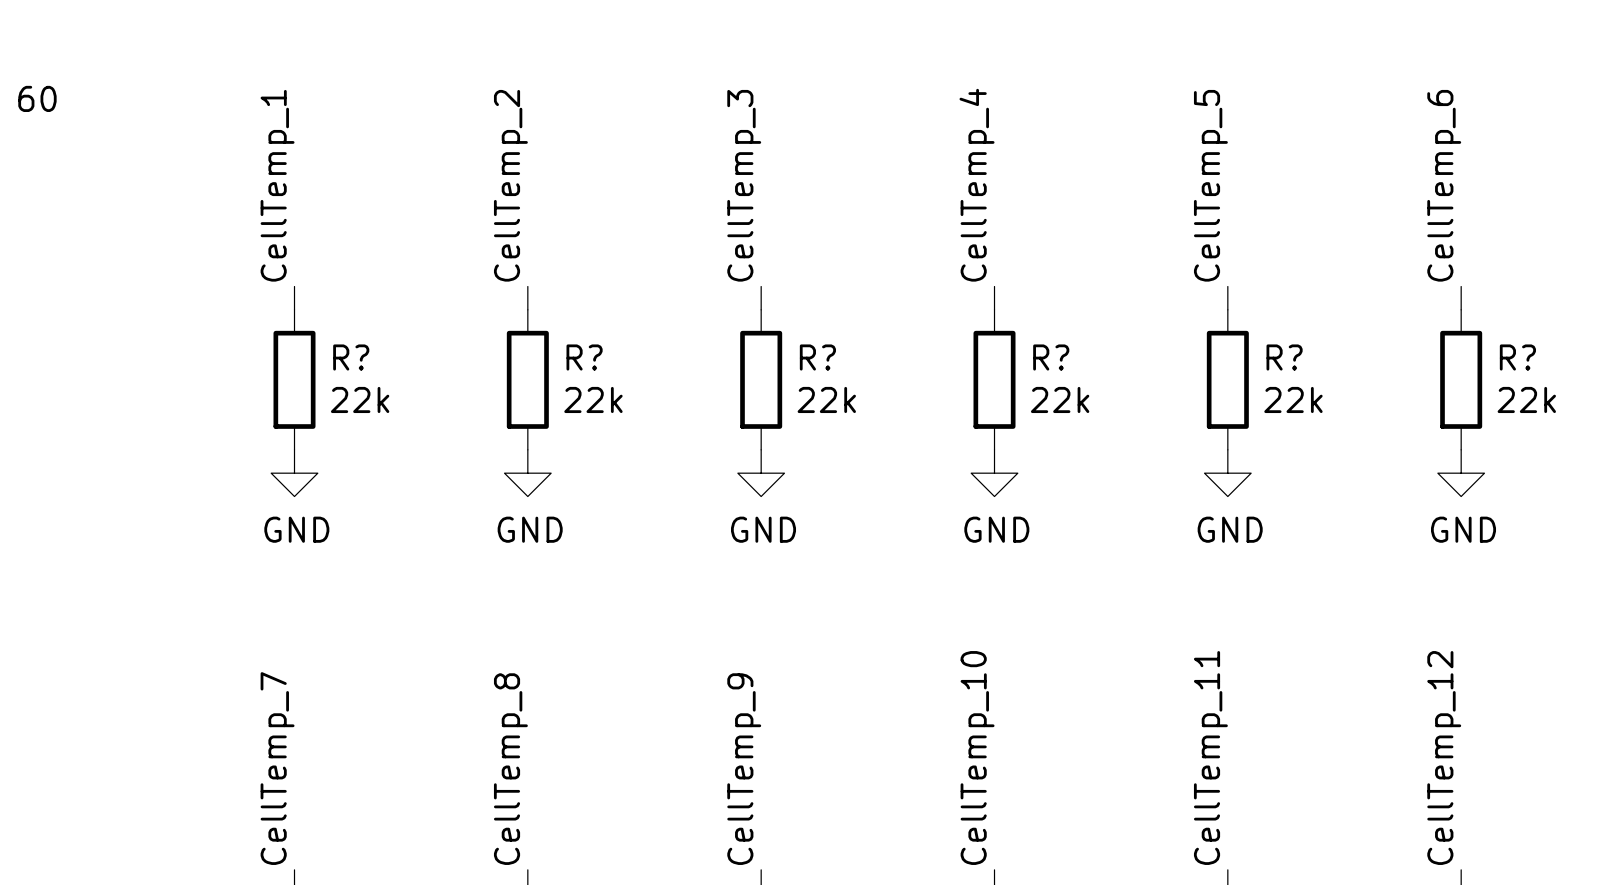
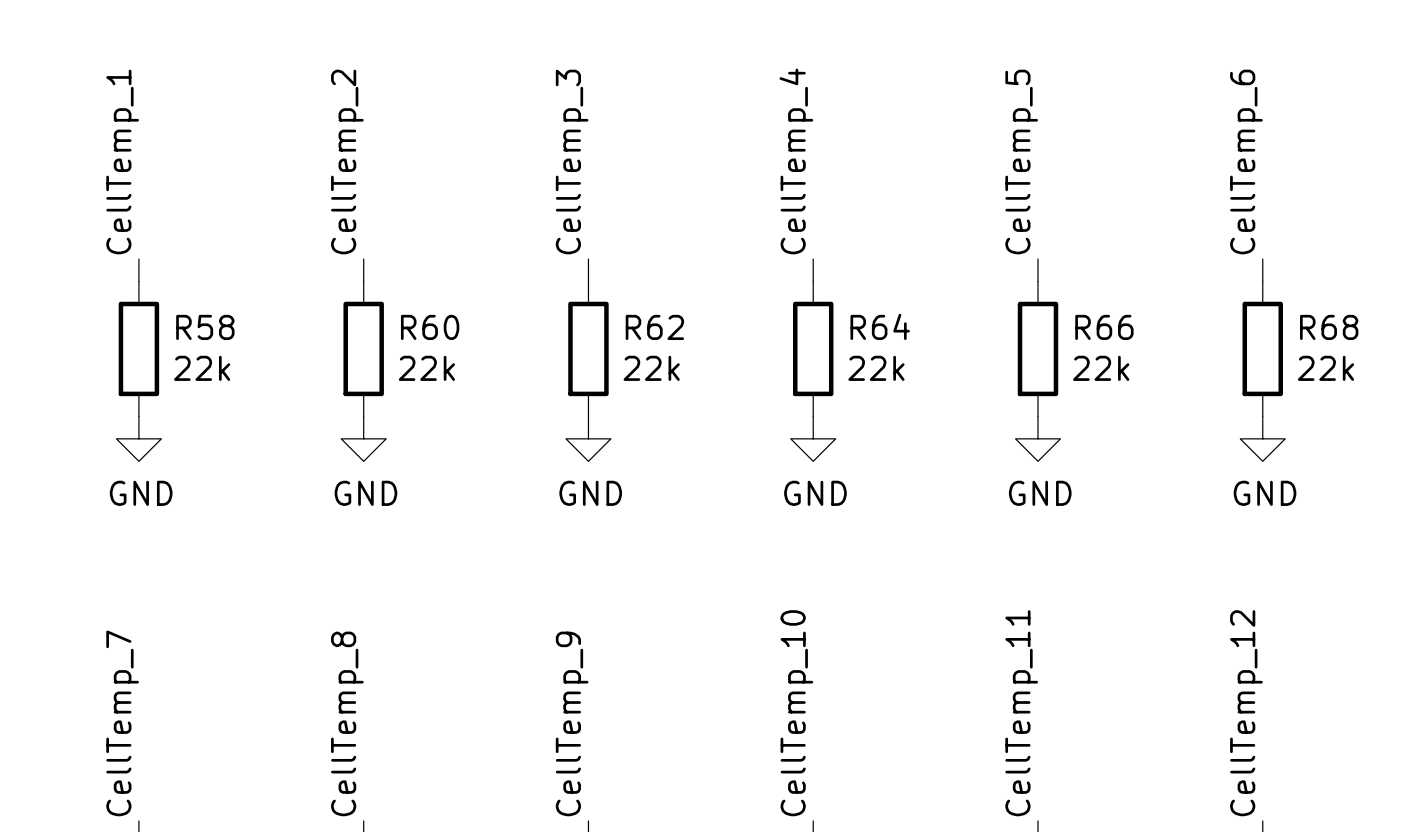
R? name: R? (351, 357) -> R58 (205, 327)
R? name: R? (584, 357) -> R60 (430, 327)
R? name: R? (817, 357) -> R62 (654, 327)
R? name: R? (1051, 357) -> R64 (880, 326)
R? name: R? (1284, 357) -> R66 (1104, 327)
R? name: R? (1517, 357) -> R68 (1329, 327)

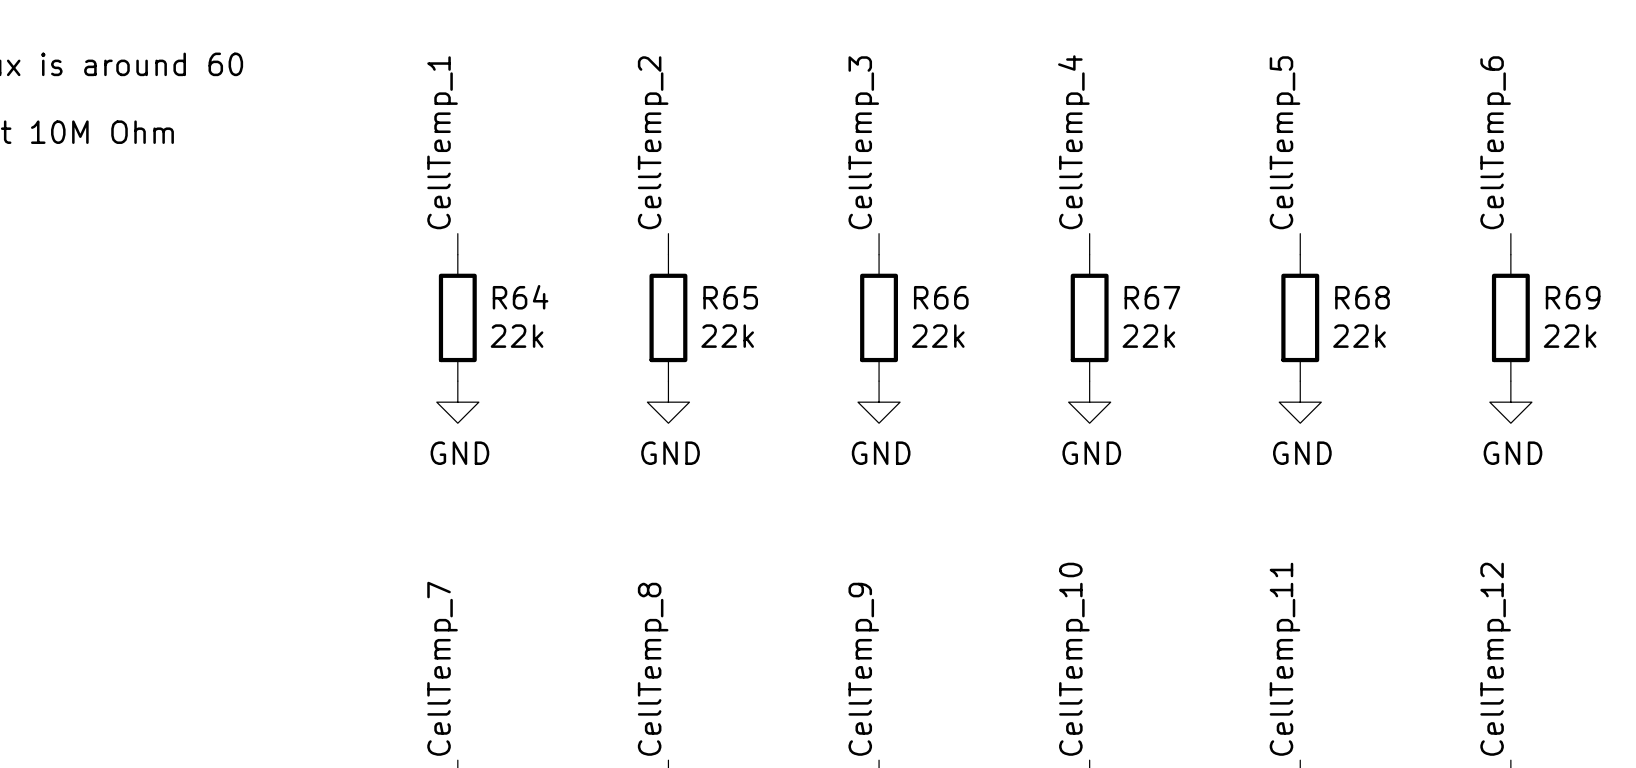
R64 name: R64 (880, 326) -> R67 (1152, 297)
R58 name: R58 (205, 327) -> R64 (520, 297)
R60 name: R60 (430, 327) -> R65 (730, 297)
R62 name: R62 (654, 327) -> R66 (941, 297)
R66 name: R66 (1104, 327) -> R68 (1362, 297)
R68 name: R68 (1329, 327) -> R69 (1573, 297)

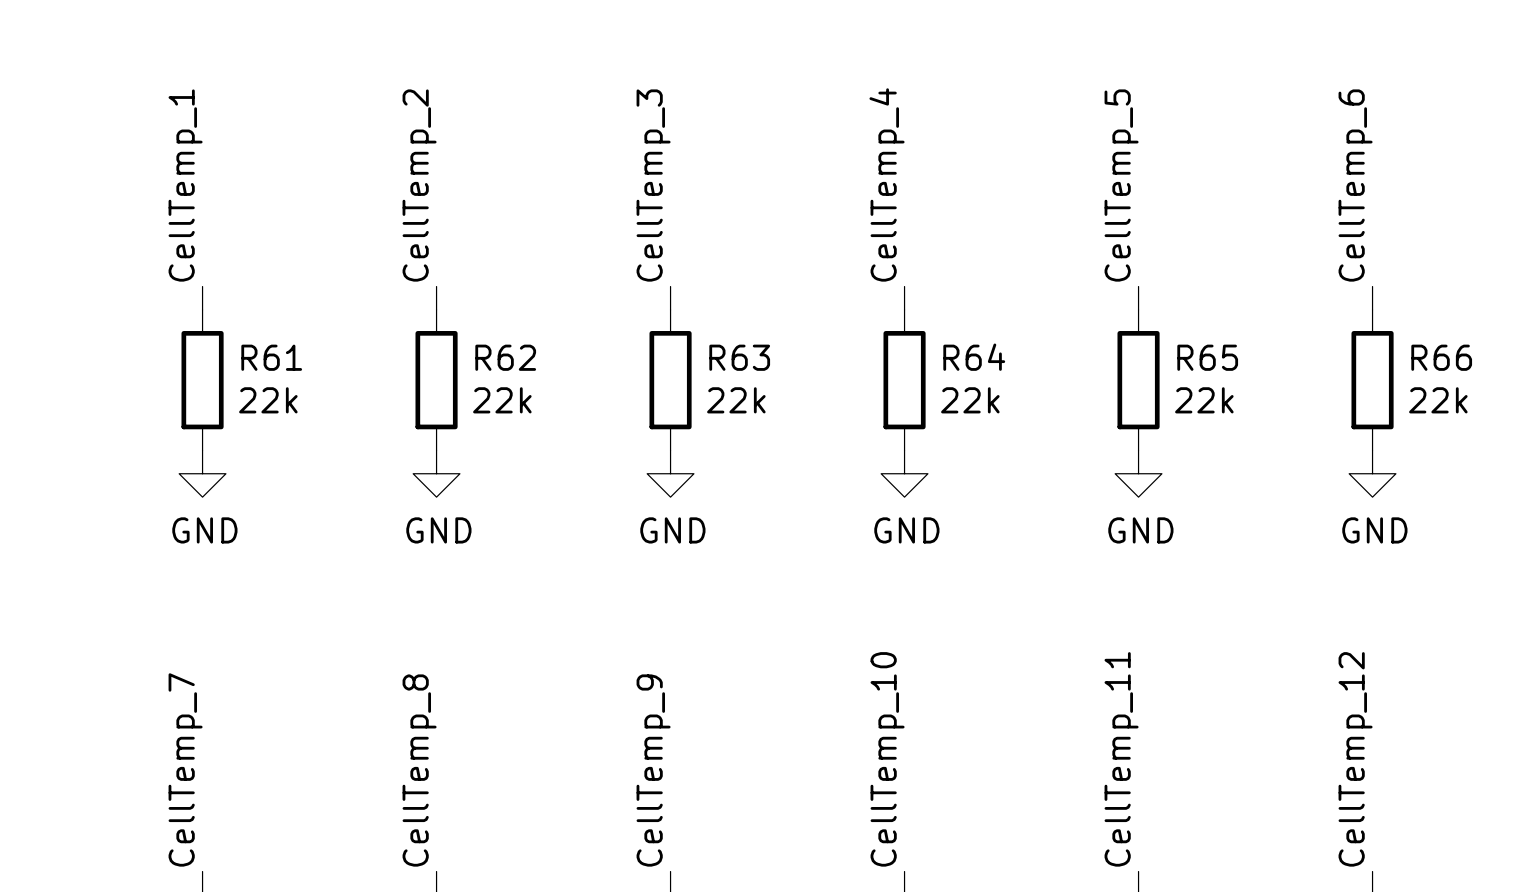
R64 name: R64 (520, 297) -> R61 (271, 357)
R65 name: R65 (730, 297) -> R62 (505, 357)
R66 name: R66 (941, 297) -> R63 (739, 357)
R67 name: R67 (1152, 297) -> R64 (974, 357)
R68 name: R68 (1362, 297) -> R65 (1207, 357)
R69 name: R69 (1573, 297) -> R66 (1441, 357)

